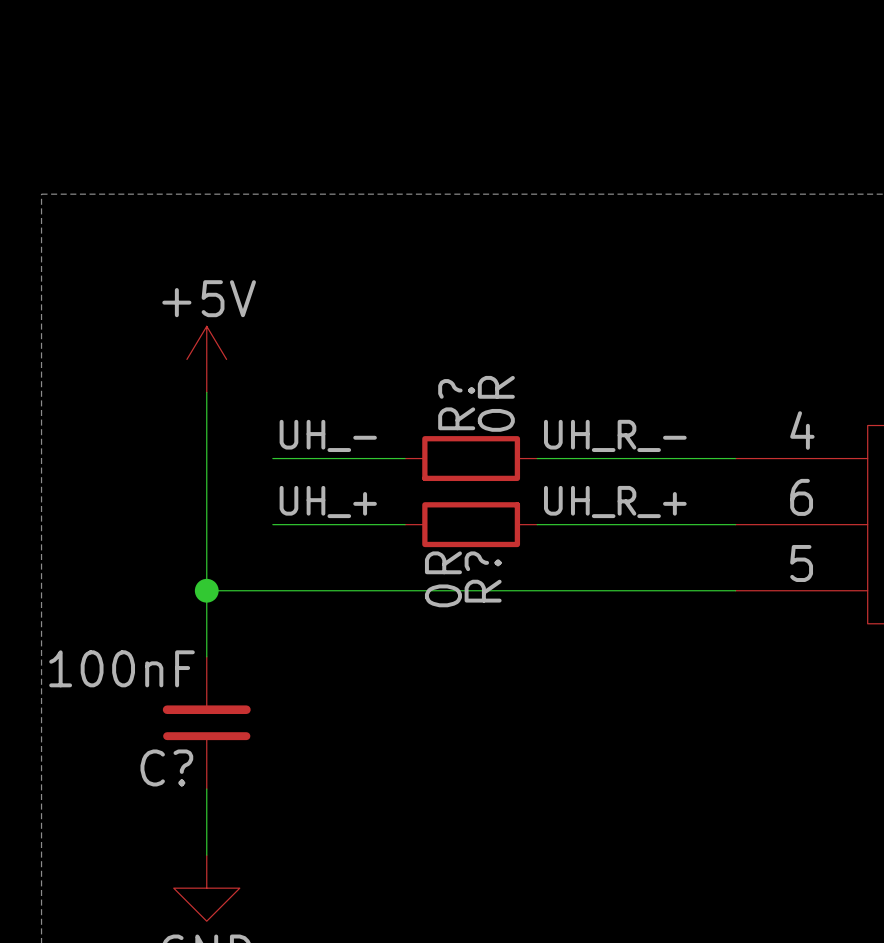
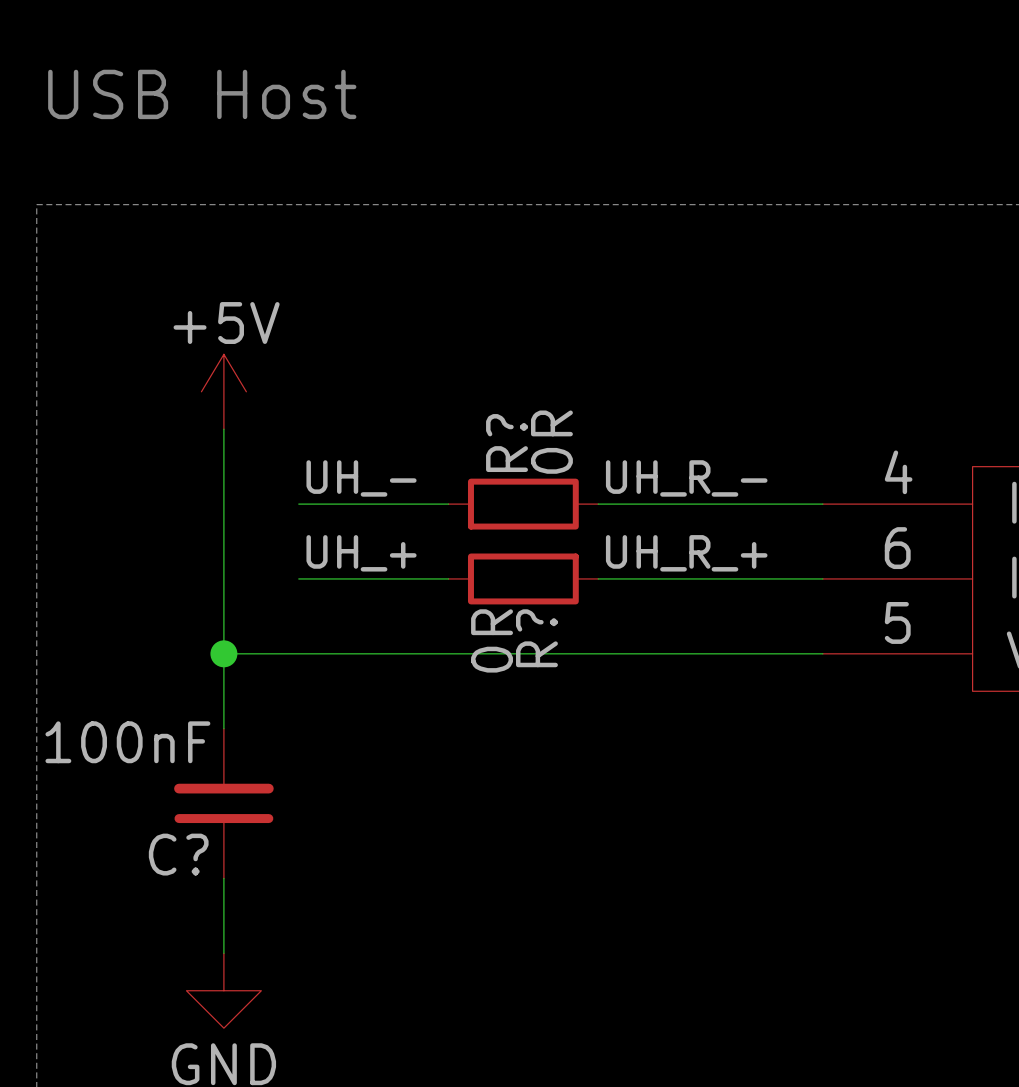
text: none -> USB Host (202, 94)

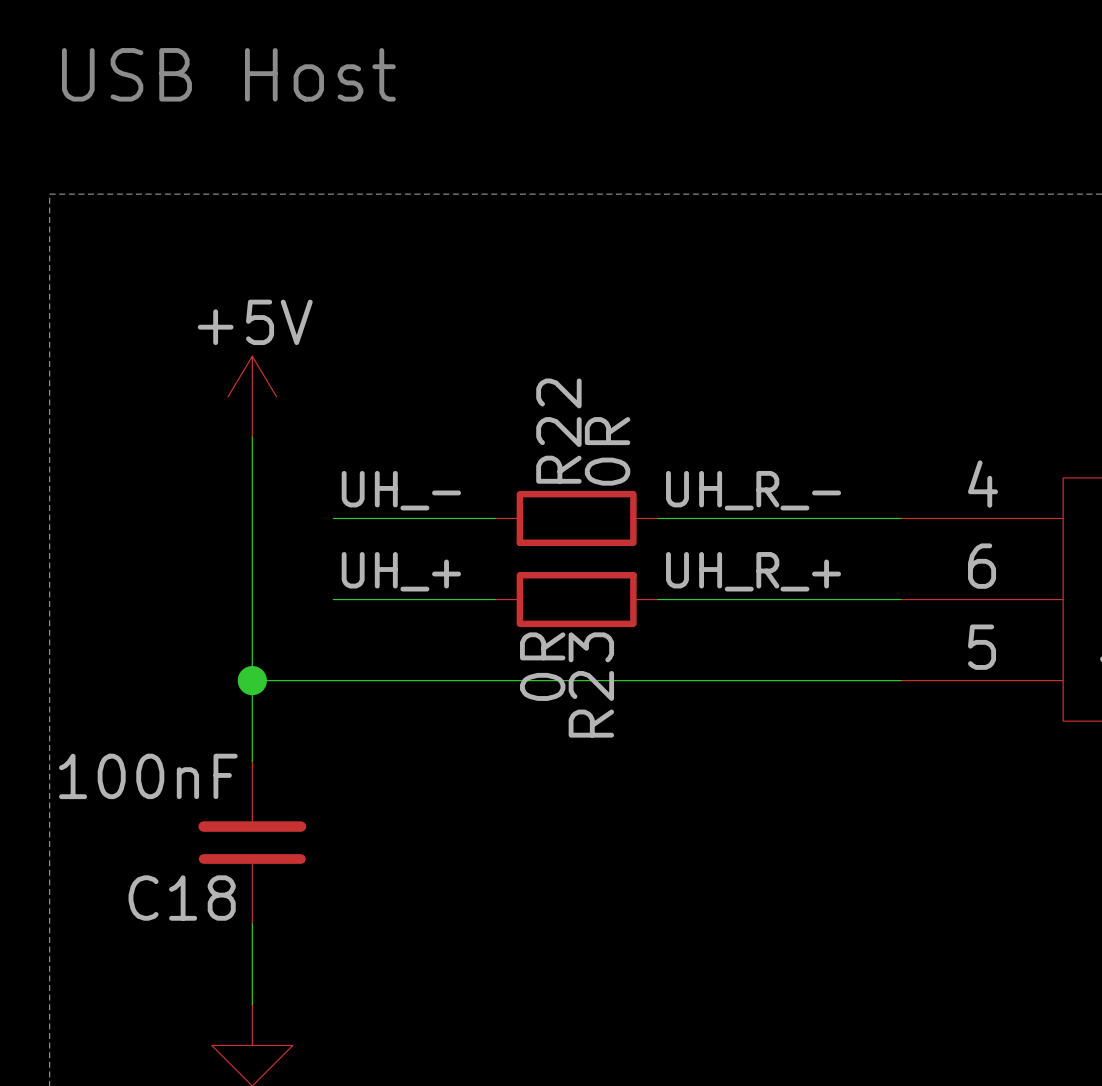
R? name: R? (507, 443) -> R22 (558, 431)
R? name: R? (536, 638) -> R23 (591, 684)
C? name: C? (178, 854) -> C18 (182, 898)

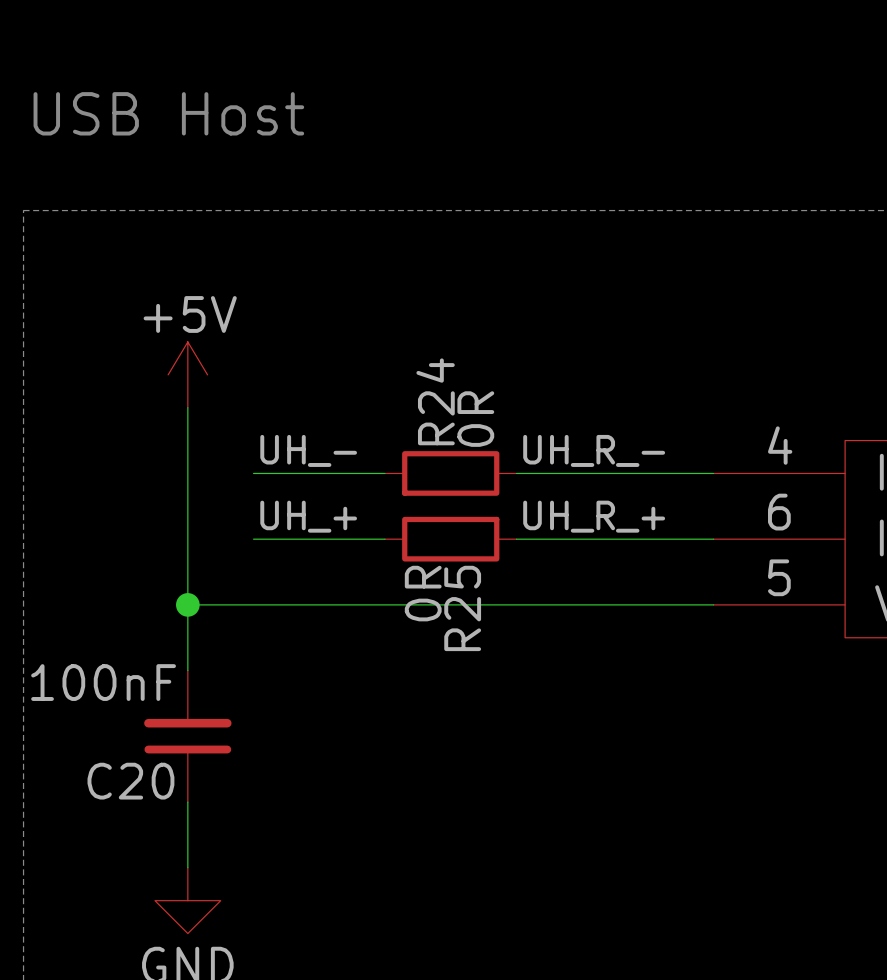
R22 name: R22 (558, 431) -> R24 (435, 401)
R23 name: R23 (591, 684) -> R25 (462, 608)
C18 name: C18 (182, 898) -> C20 (130, 781)

